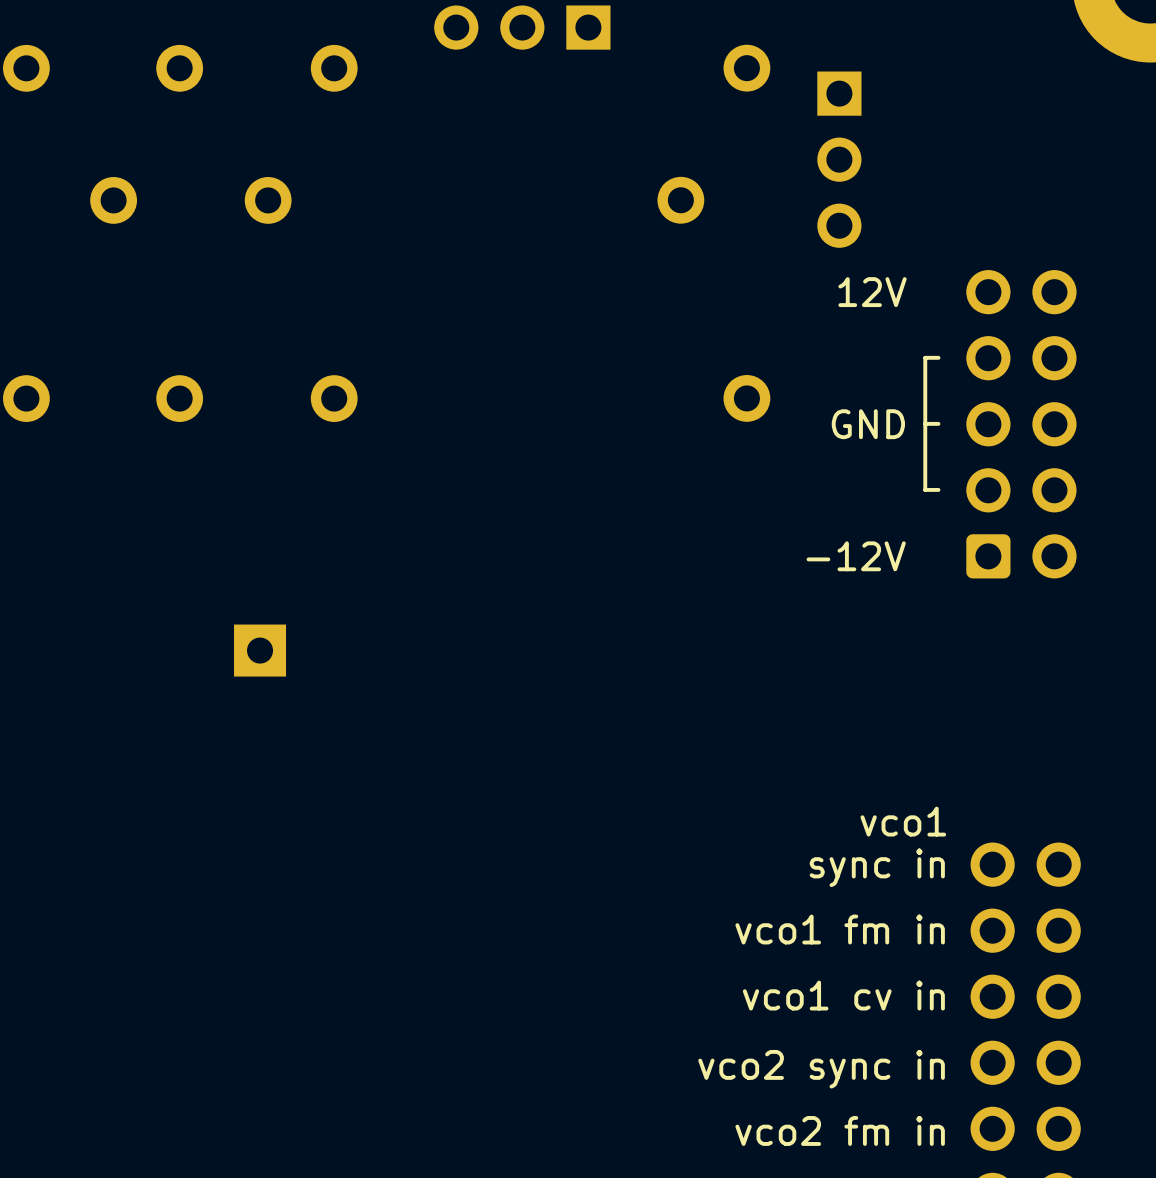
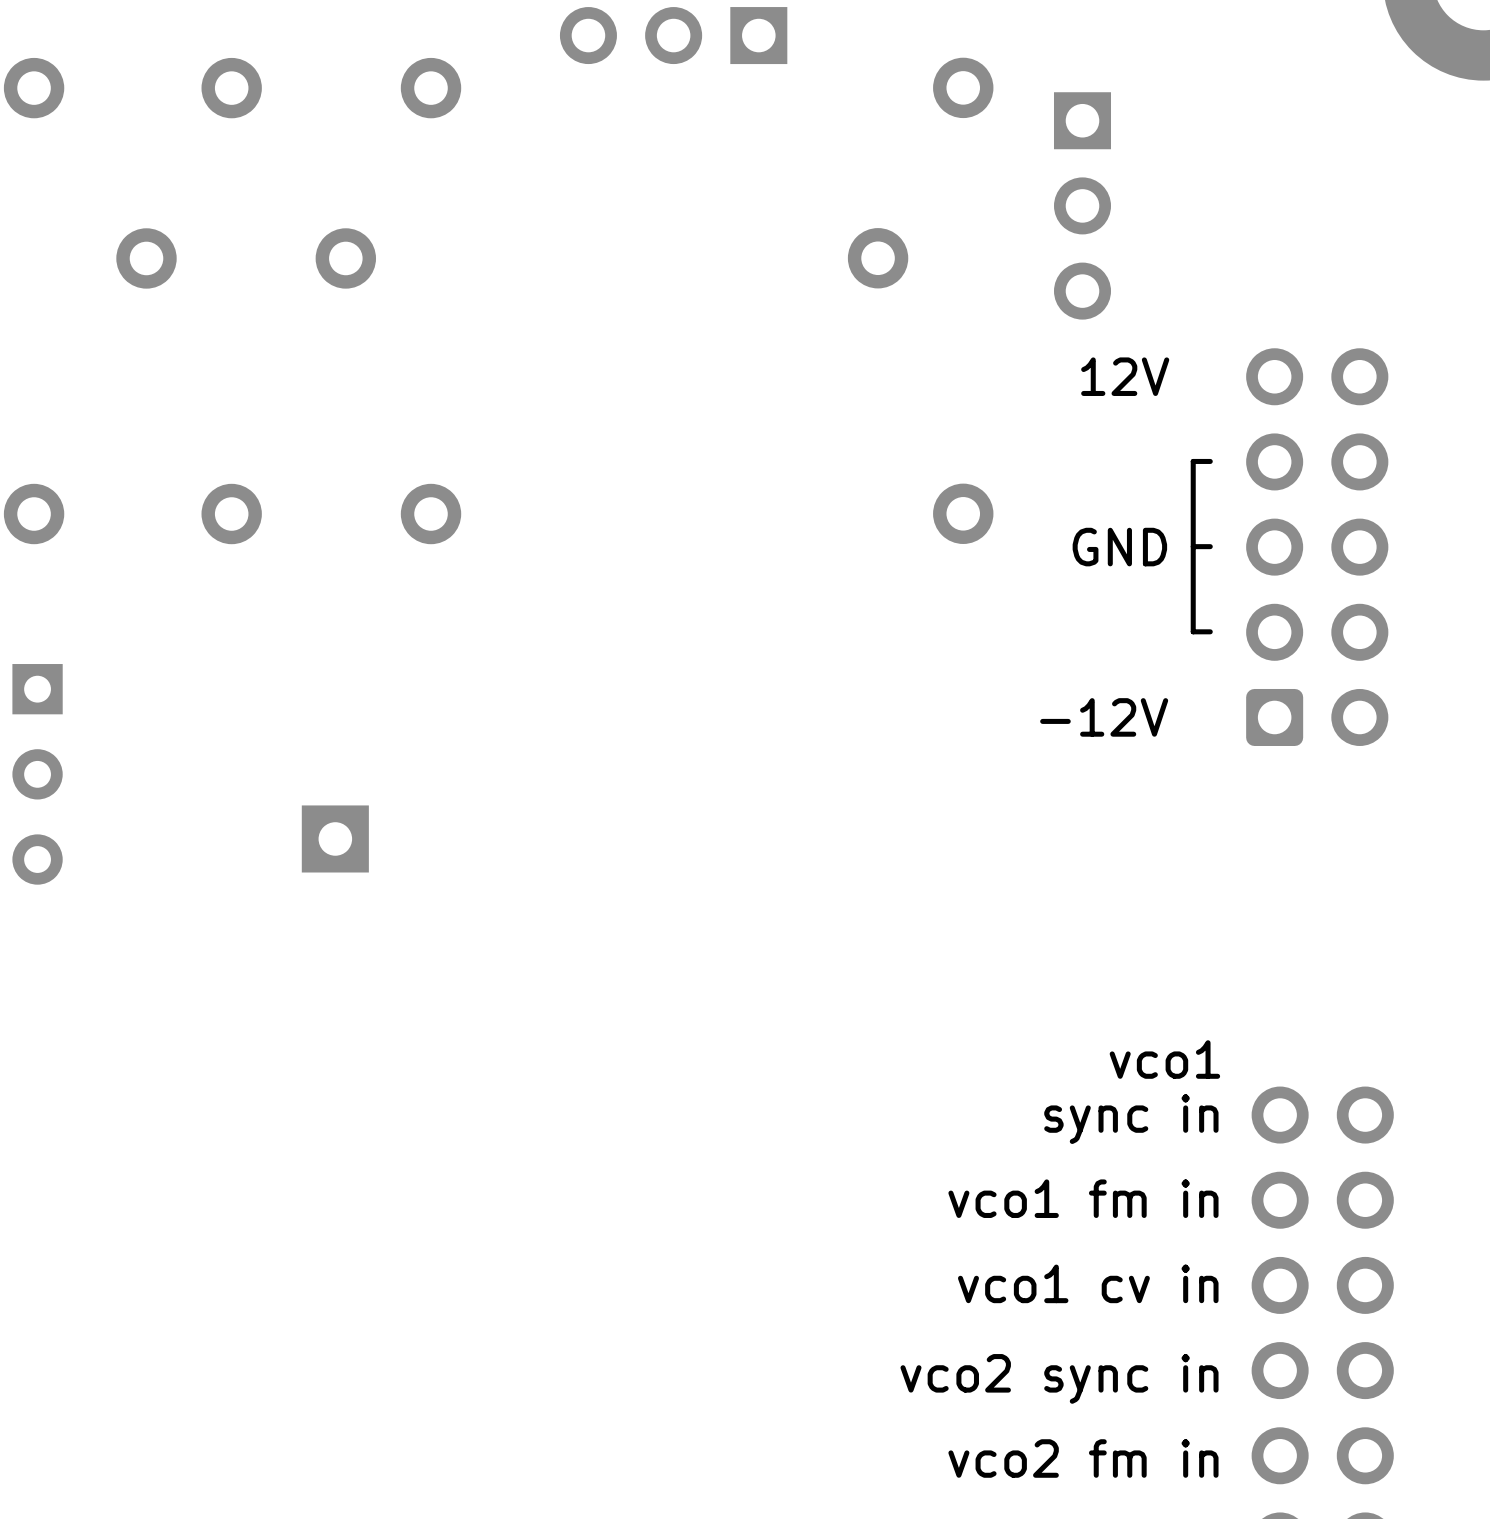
part: none -> (37, 774)

